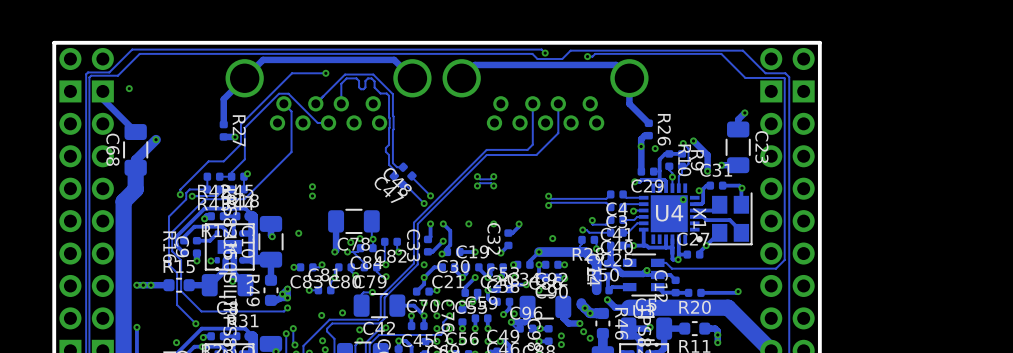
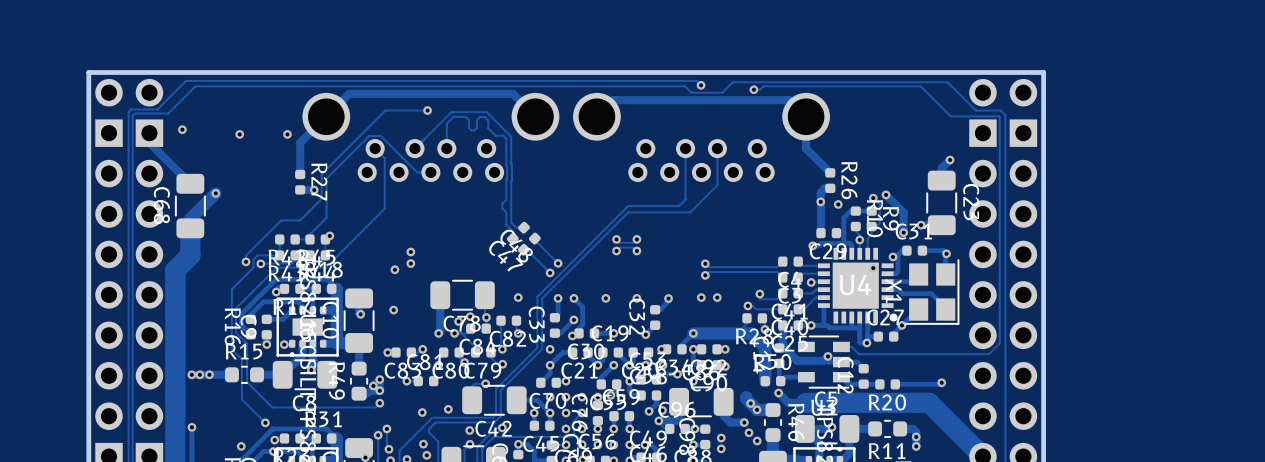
via: none -> (239, 134)
via: none -> (287, 134)
via: none -> (394, 269)
via: none -> (518, 297)
via: none -> (701, 297)
via: none -> (717, 297)
via: (552, 238) -> none

